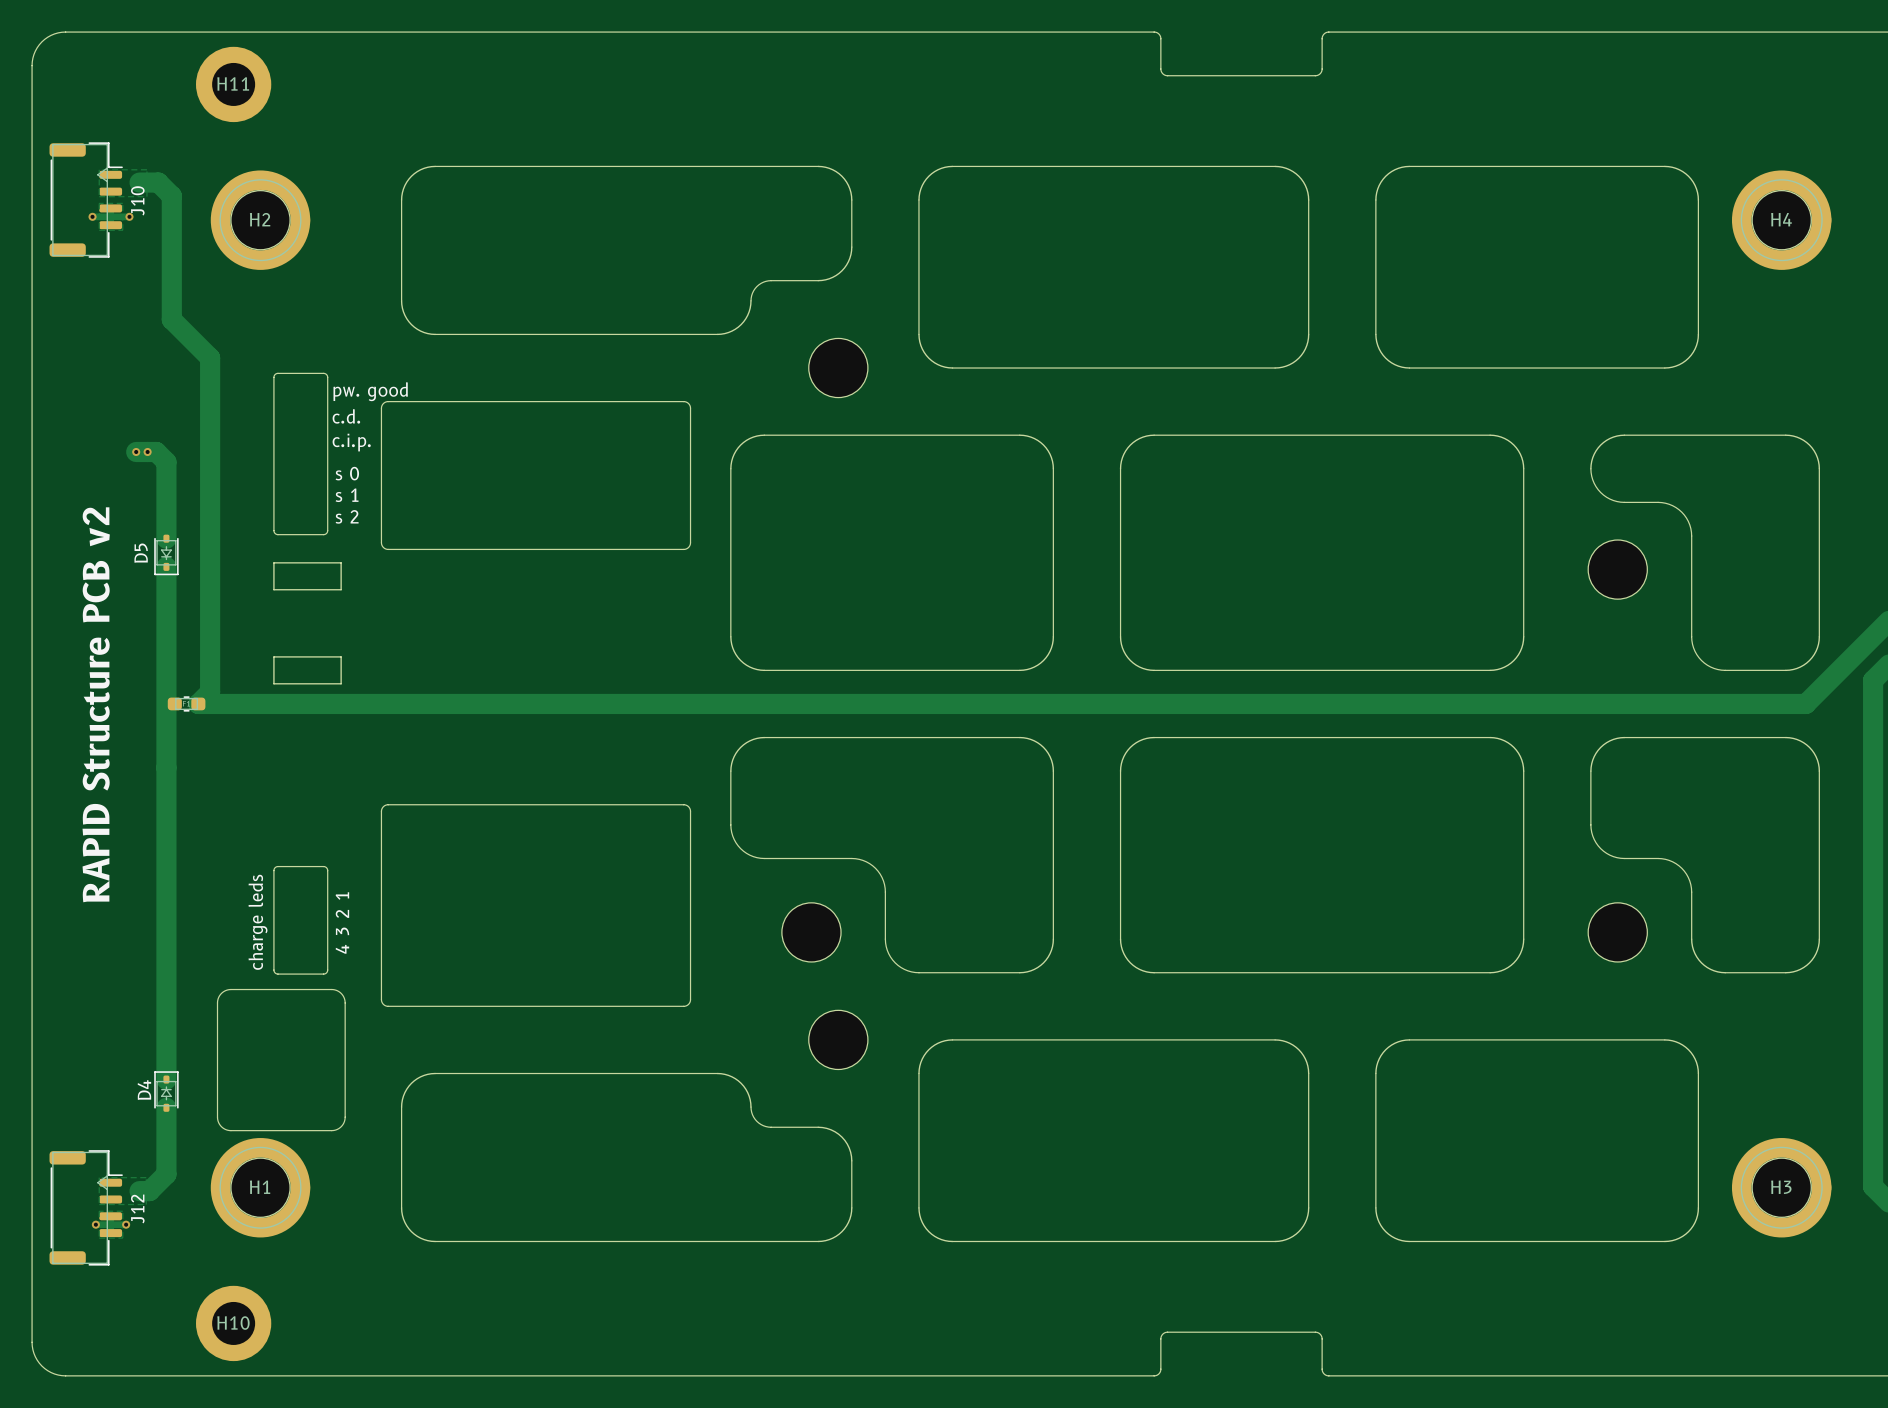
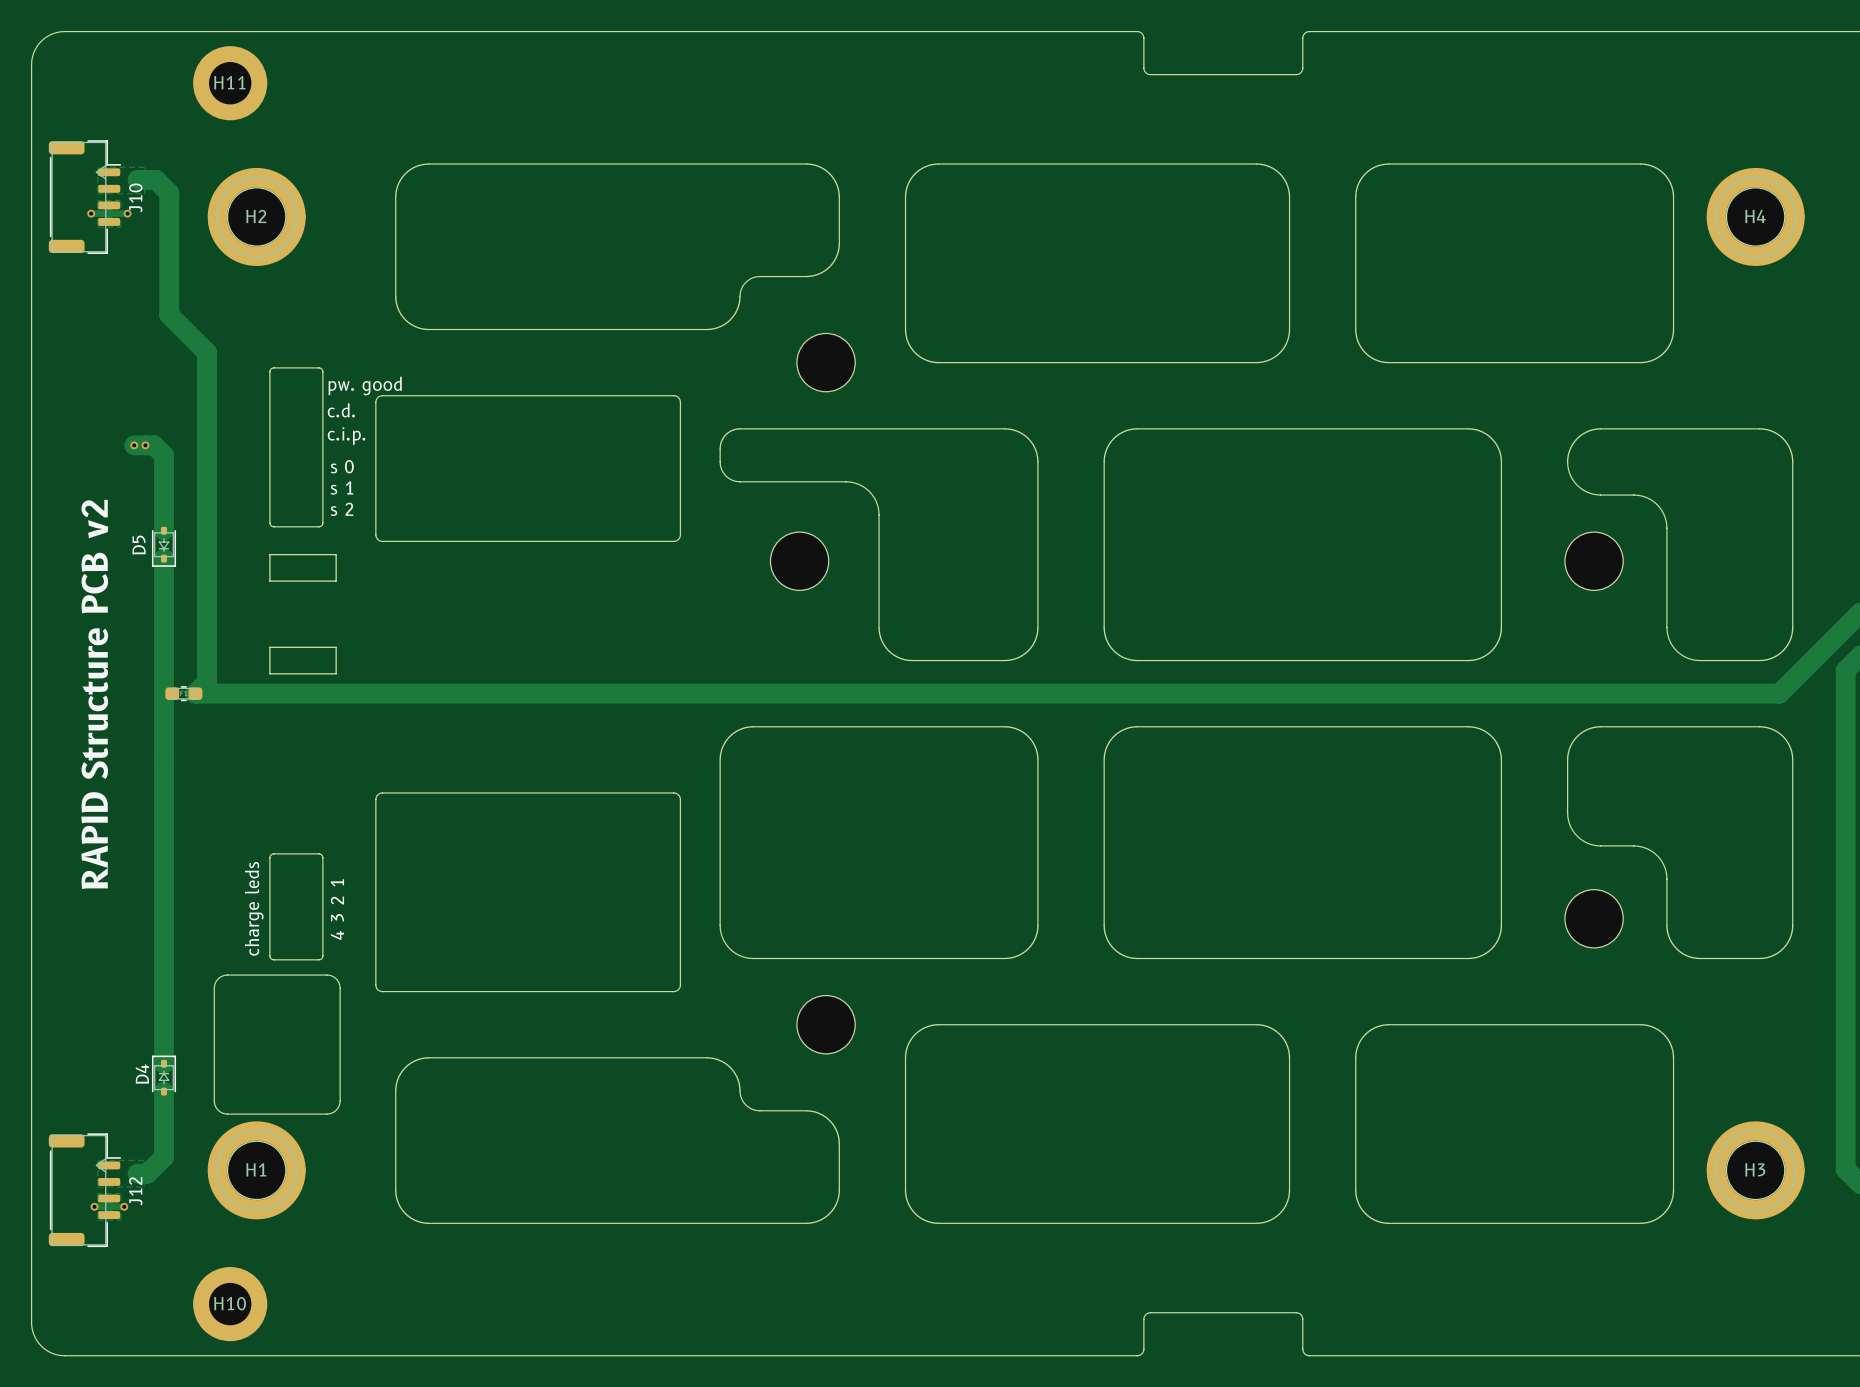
board edge: (764, 435) (753, 437) (743, 442) (735, 450) (731, 465) (730, 636) (735, 654) (746, 665) (760, 670) (925, 670) -> (753, 428) (732, 430) (725, 434) (721, 441) (720, 467) (724, 474) (730, 479) (740, 481) (849, 482) (863, 486) (873, 497) (879, 514) (879, 634) (884, 645) (891, 653) (901, 658) (912, 660)
part: none -> (799, 561)
board edge: (730, 824) (732, 836) (738, 845) (753, 856) (764, 858) (855, 858) (872, 865) (880, 874) (884, 884) (885, 942) (888, 953) (901, 967) (918, 972) -> (720, 812) (720, 929) (725, 943) (732, 951) (742, 956) (753, 958) (905, 958)
part: (811, 932) -> none

